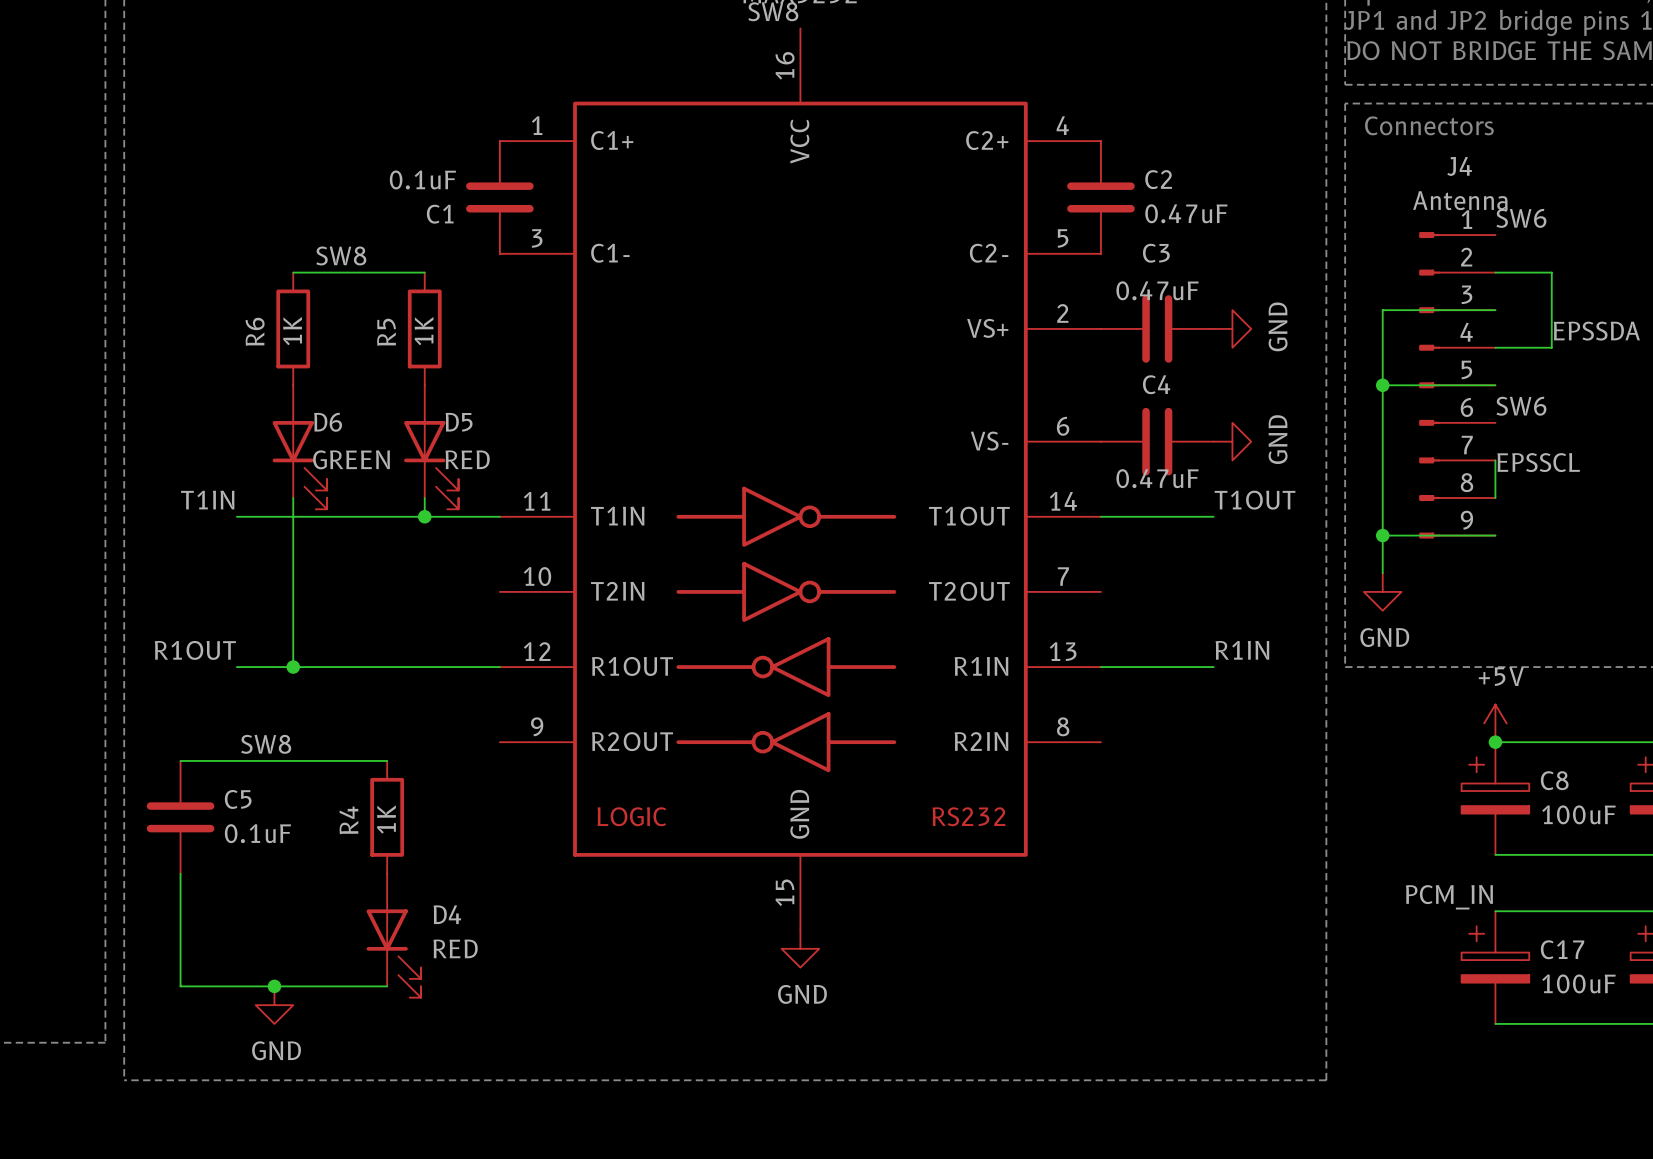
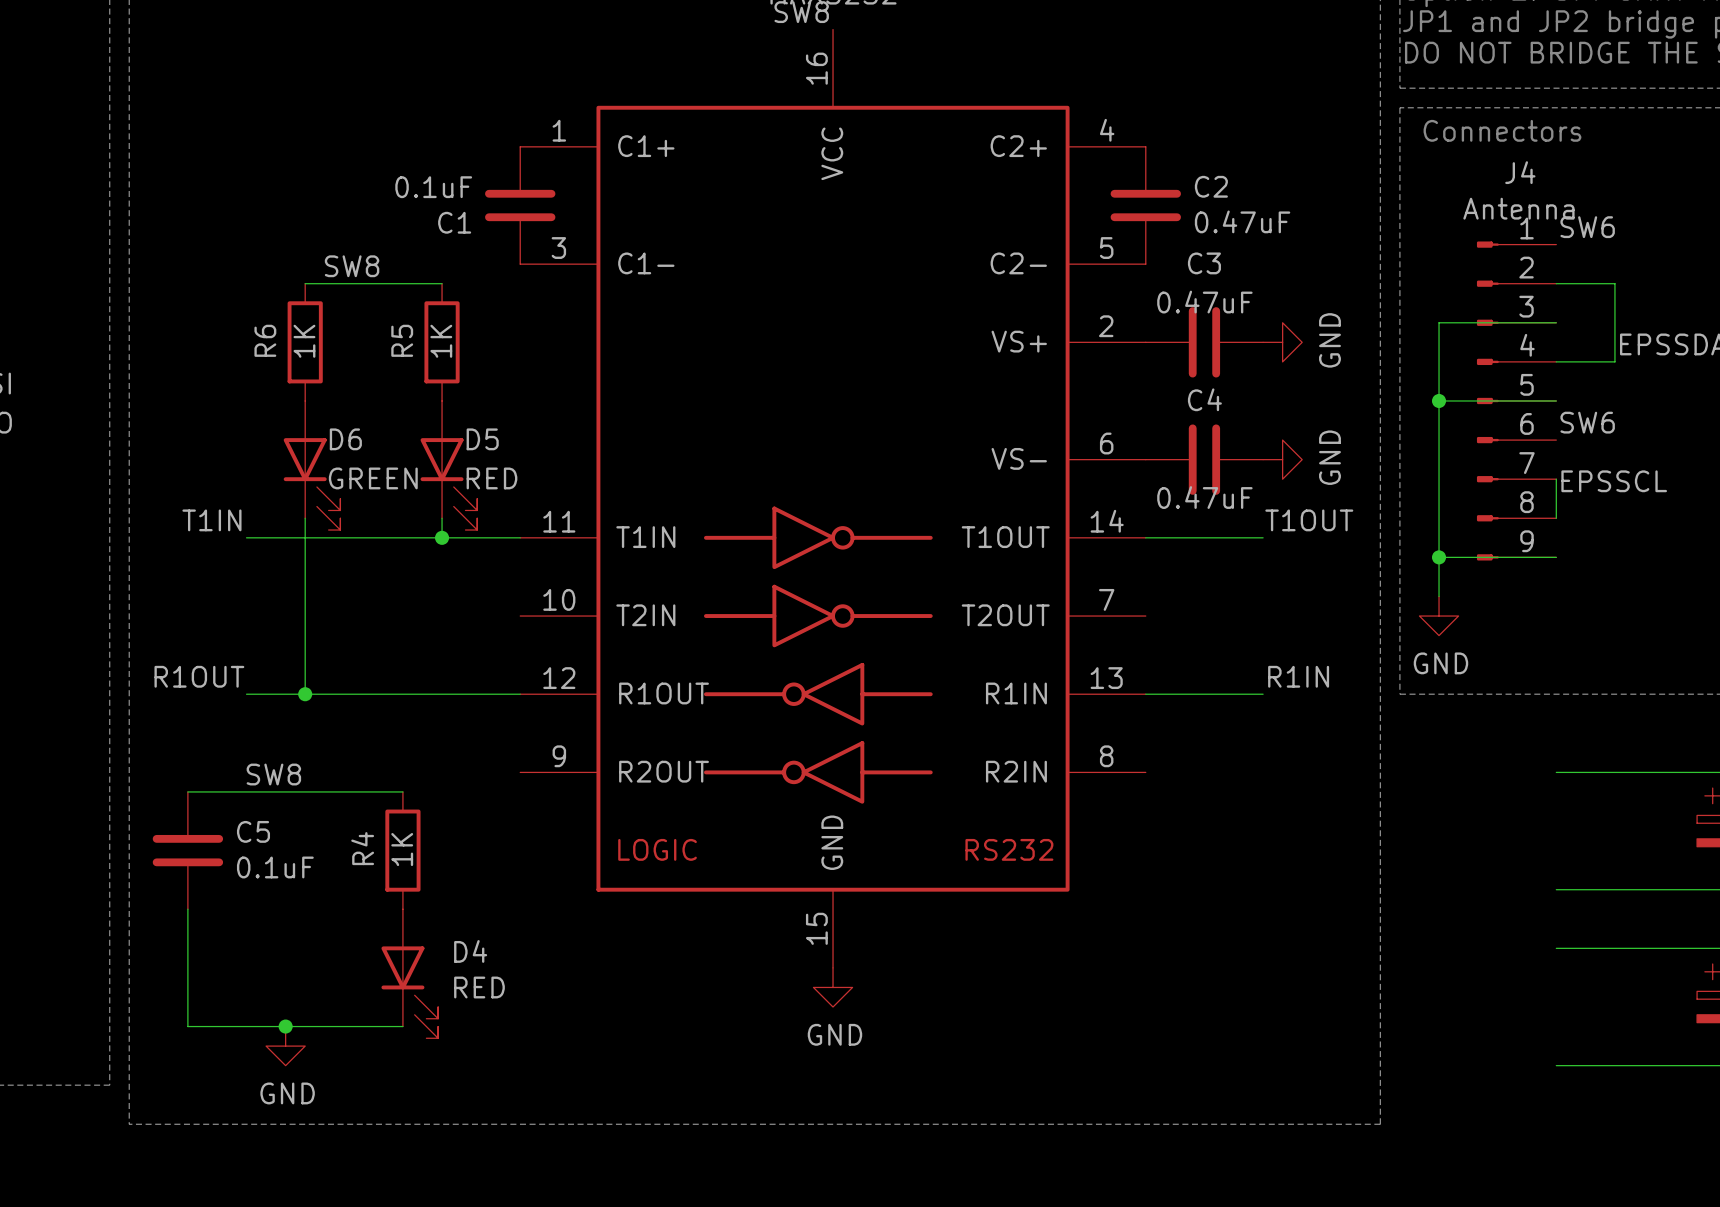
power symbol: +5V (1495, 723) -> none
junction: (1495, 742) -> none
C8: 100uF (1495, 798) -> none
label: PCM_IN (1449, 897) -> none
C17: 100uF (1495, 967) -> none

